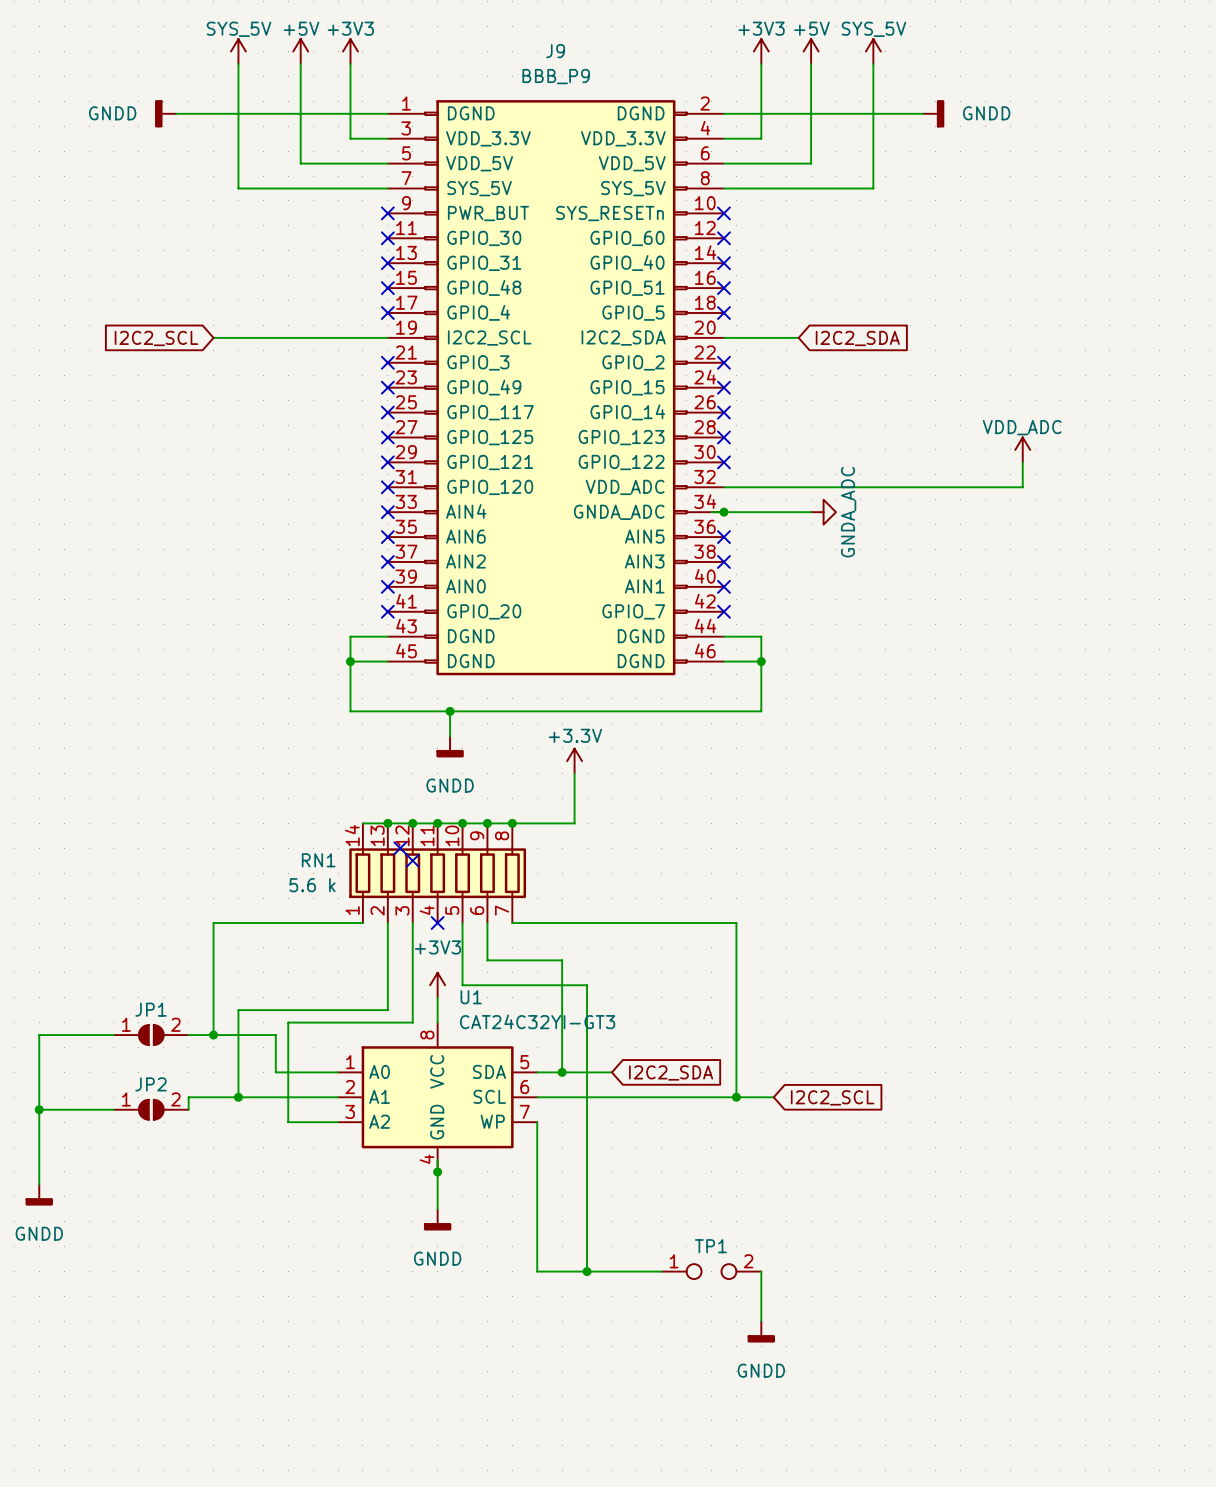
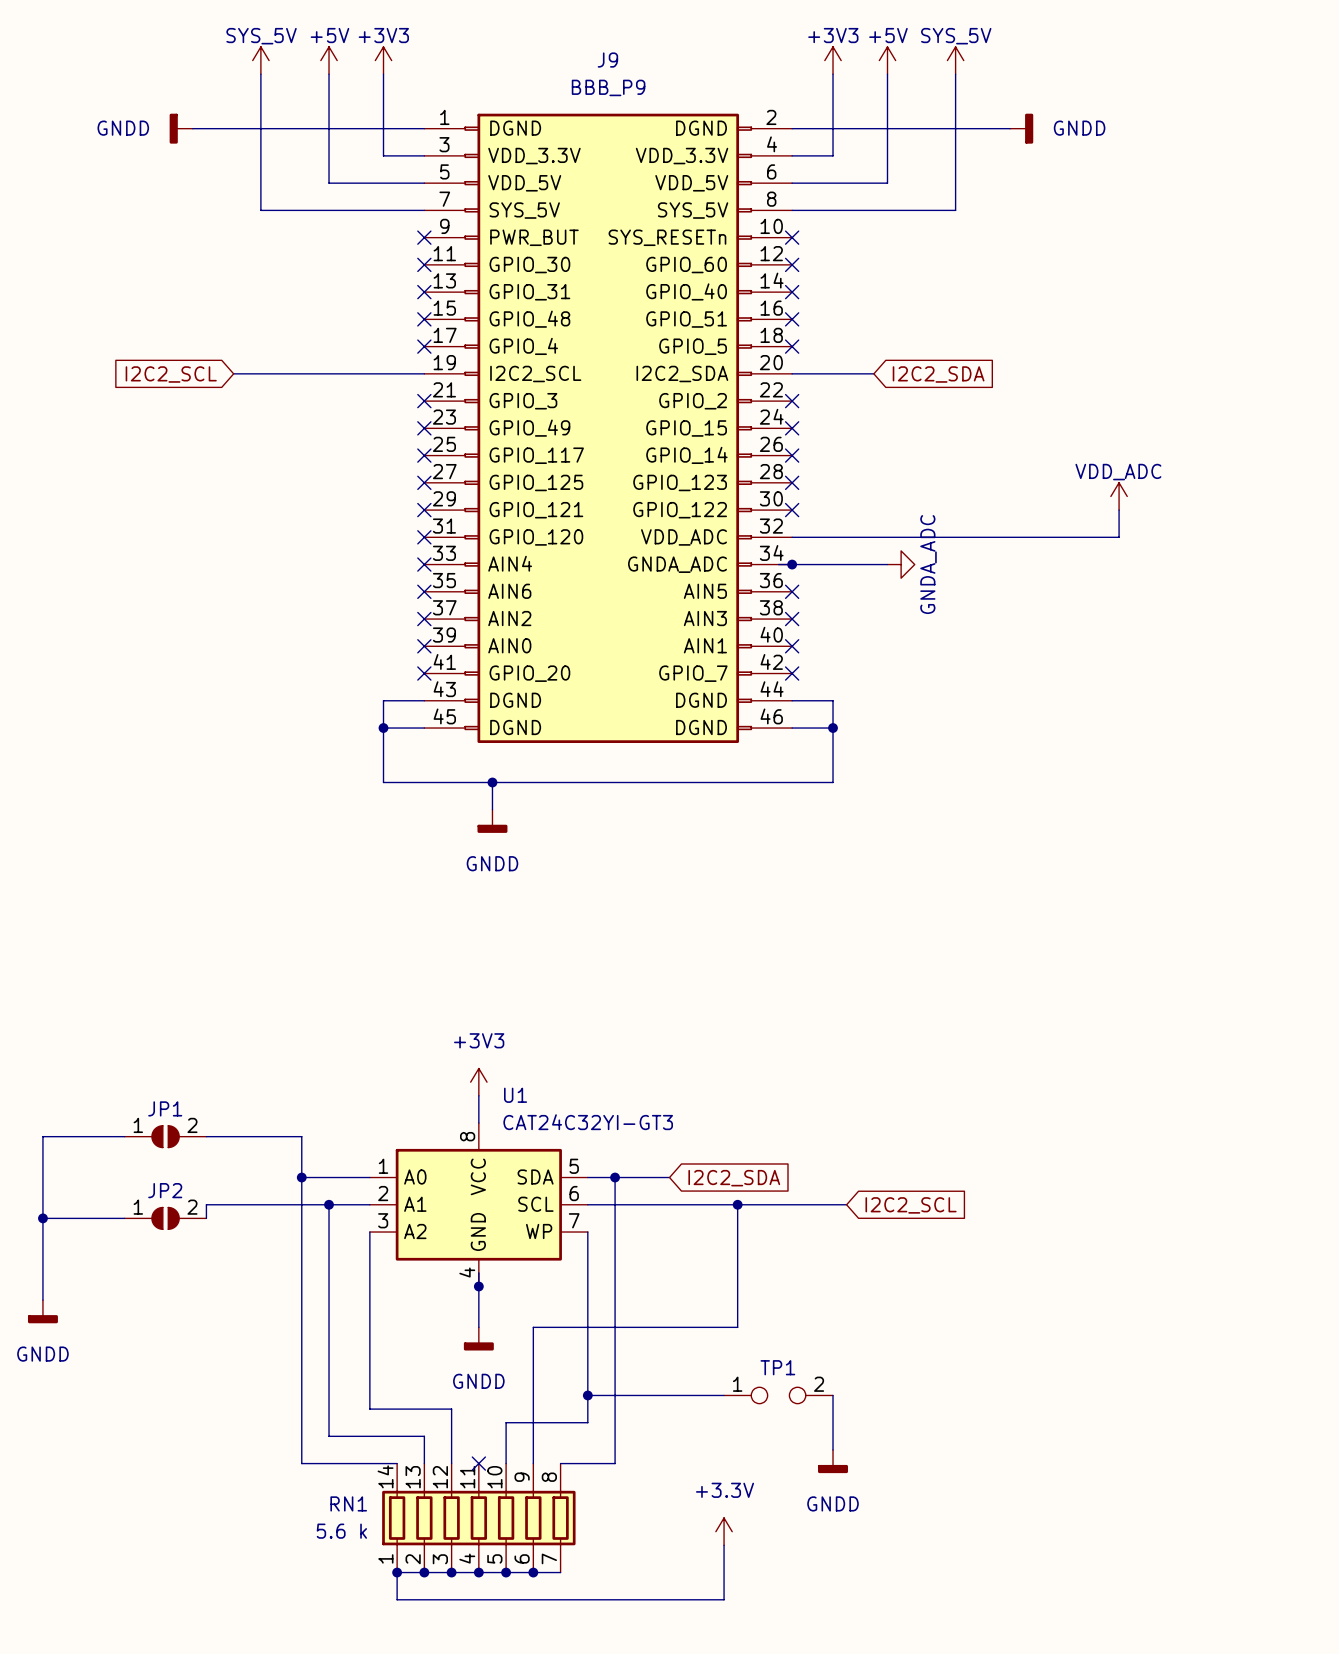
power symbol: +3.3V (574, 761) -> none
wire: (574, 773) (574, 823) (362, 823) -> none
junction: (387, 823) -> none
junction: (412, 823) -> none
junction: (437, 823) -> none
junction: (462, 823) -> none
junction: (487, 823) -> none
junction: (512, 823) -> none
no-connect mark: (400, 848) -> none
no-connect mark: (412, 860) -> none
RN1 position: (437, 873) -> (478, 1518)
wire: (362, 923) (213, 923) (213, 1035) -> none
wire: (387, 923) (387, 1010) (238, 1010) (238, 1097) -> none
wire: (412, 923) (412, 1022) (288, 1022) (288, 1122) (338, 1122) -> (451, 1463) (451, 1409) (369, 1409) (369, 1232)
no-connect mark: (437, 923) -> none
wire: (462, 923) (462, 985) (587, 985) (587, 1271) -> none
wire: (487, 923) (487, 960) (562, 960) (562, 1072) -> (560, 1463) (615, 1463) (615, 1177)
wire: (512, 923) (736, 923) (736, 1097) -> none
junction: (213, 1035) -> none
wire: none -> (301, 1177) (301, 1463) (397, 1463)
junction: none -> (301, 1177)
junction: (238, 1097) -> none
wire: none -> (329, 1204) (329, 1436) (424, 1436) (424, 1463)
junction: none -> (329, 1204)
wire: none -> (737, 1204) (737, 1327) (533, 1327) (533, 1463)
junction: none -> (737, 1204)
junction: (736, 1097) -> none
wire: none -> (587, 1395) (587, 1422) (506, 1422) (506, 1463)
junction position: (587, 1271) -> (587, 1395)
no-connect mark: none -> (478, 1463)
power symbol: none -> +3.3V (724, 1531)
wire: none -> (724, 1545) (724, 1599) (397, 1599) (397, 1572) (560, 1572)
junction: none -> (397, 1572)
junction: none -> (424, 1572)
junction: none -> (451, 1572)
junction: none -> (478, 1572)
junction: none -> (506, 1572)
junction: none -> (533, 1572)

